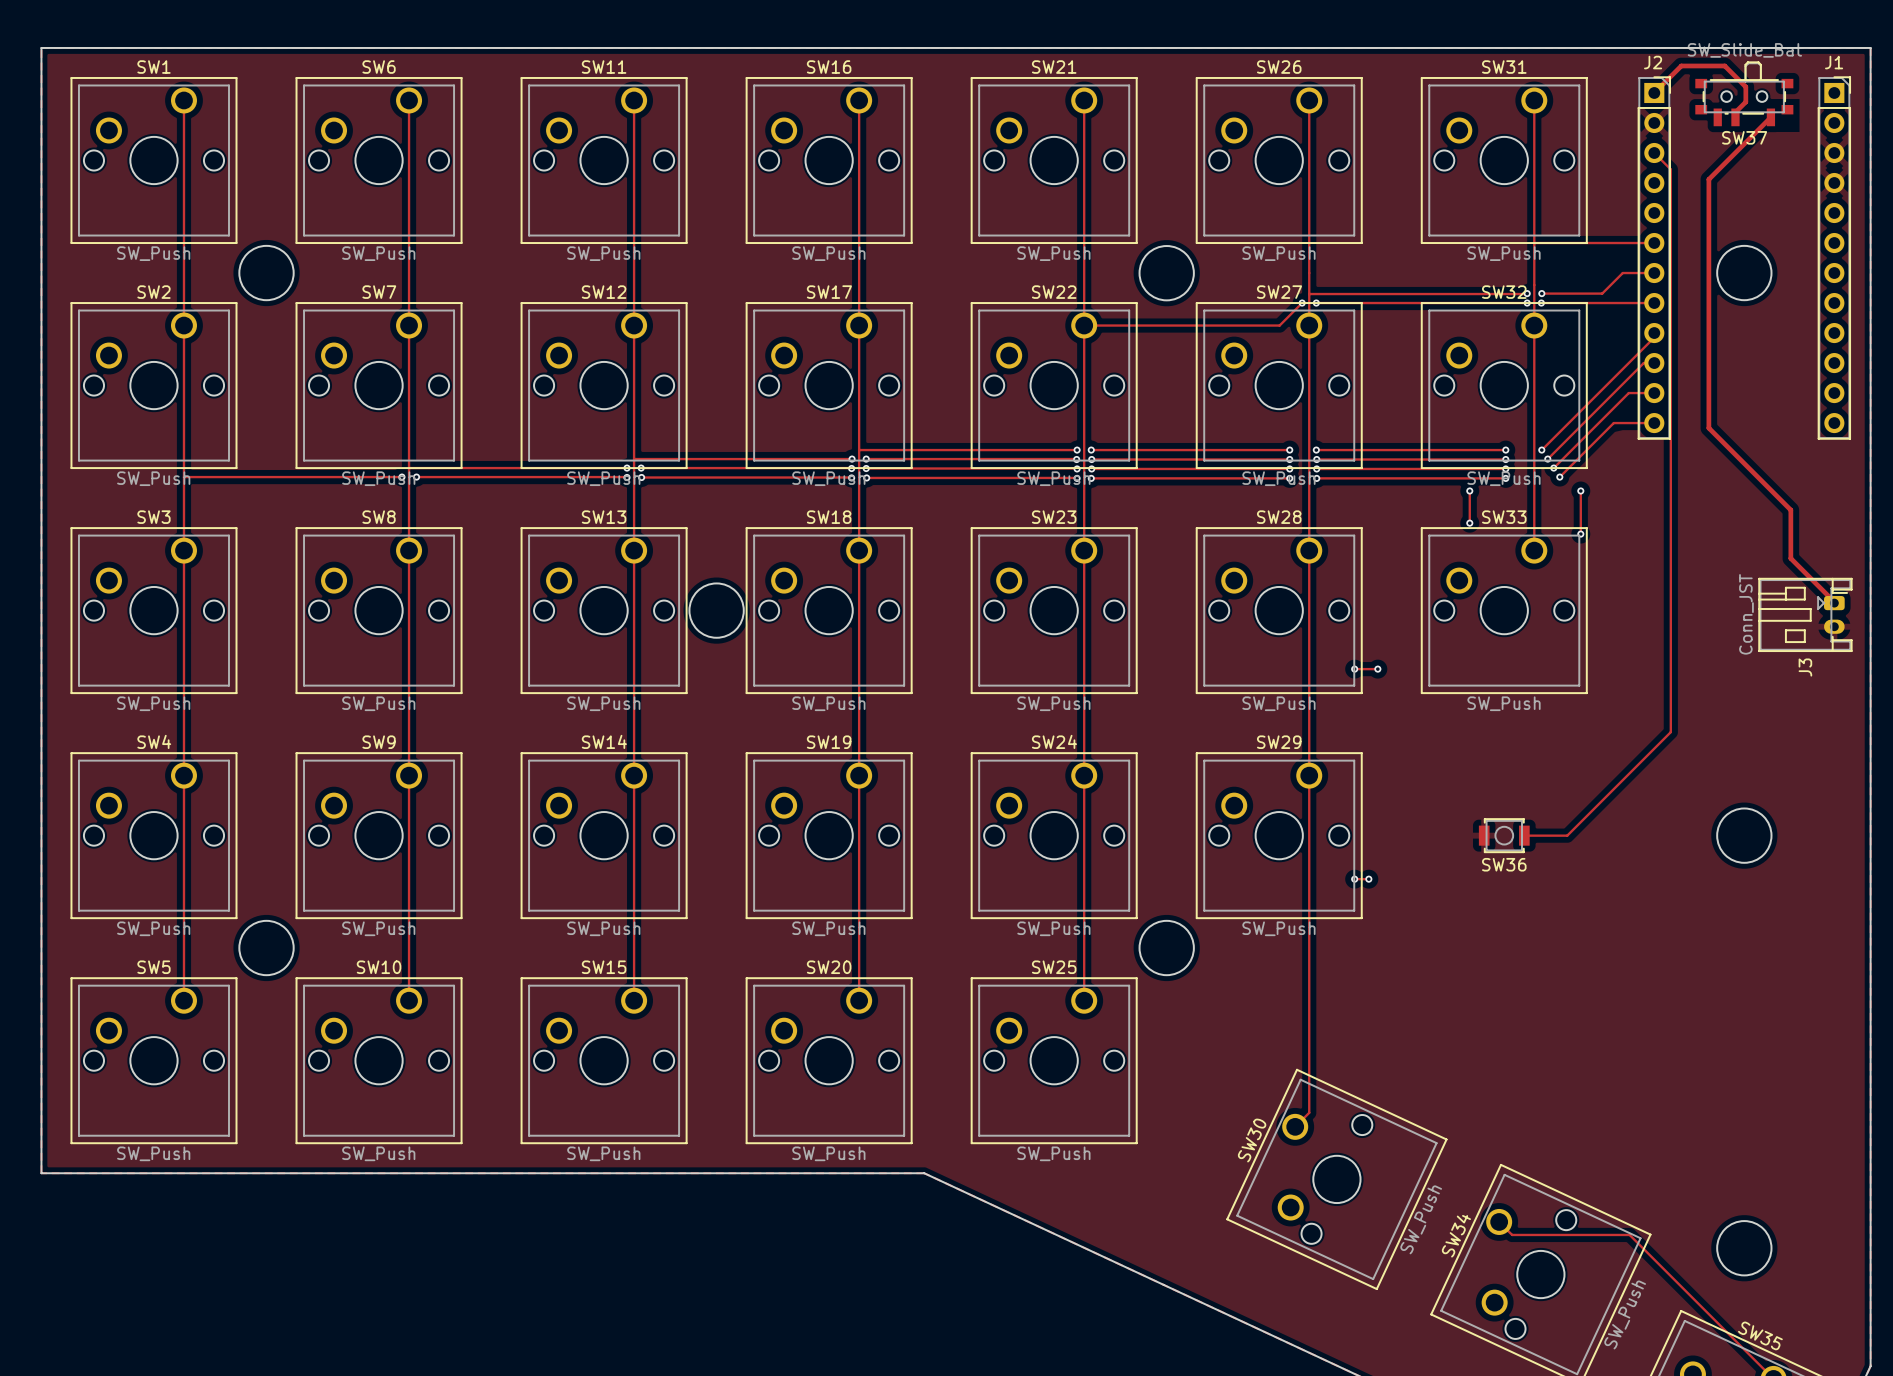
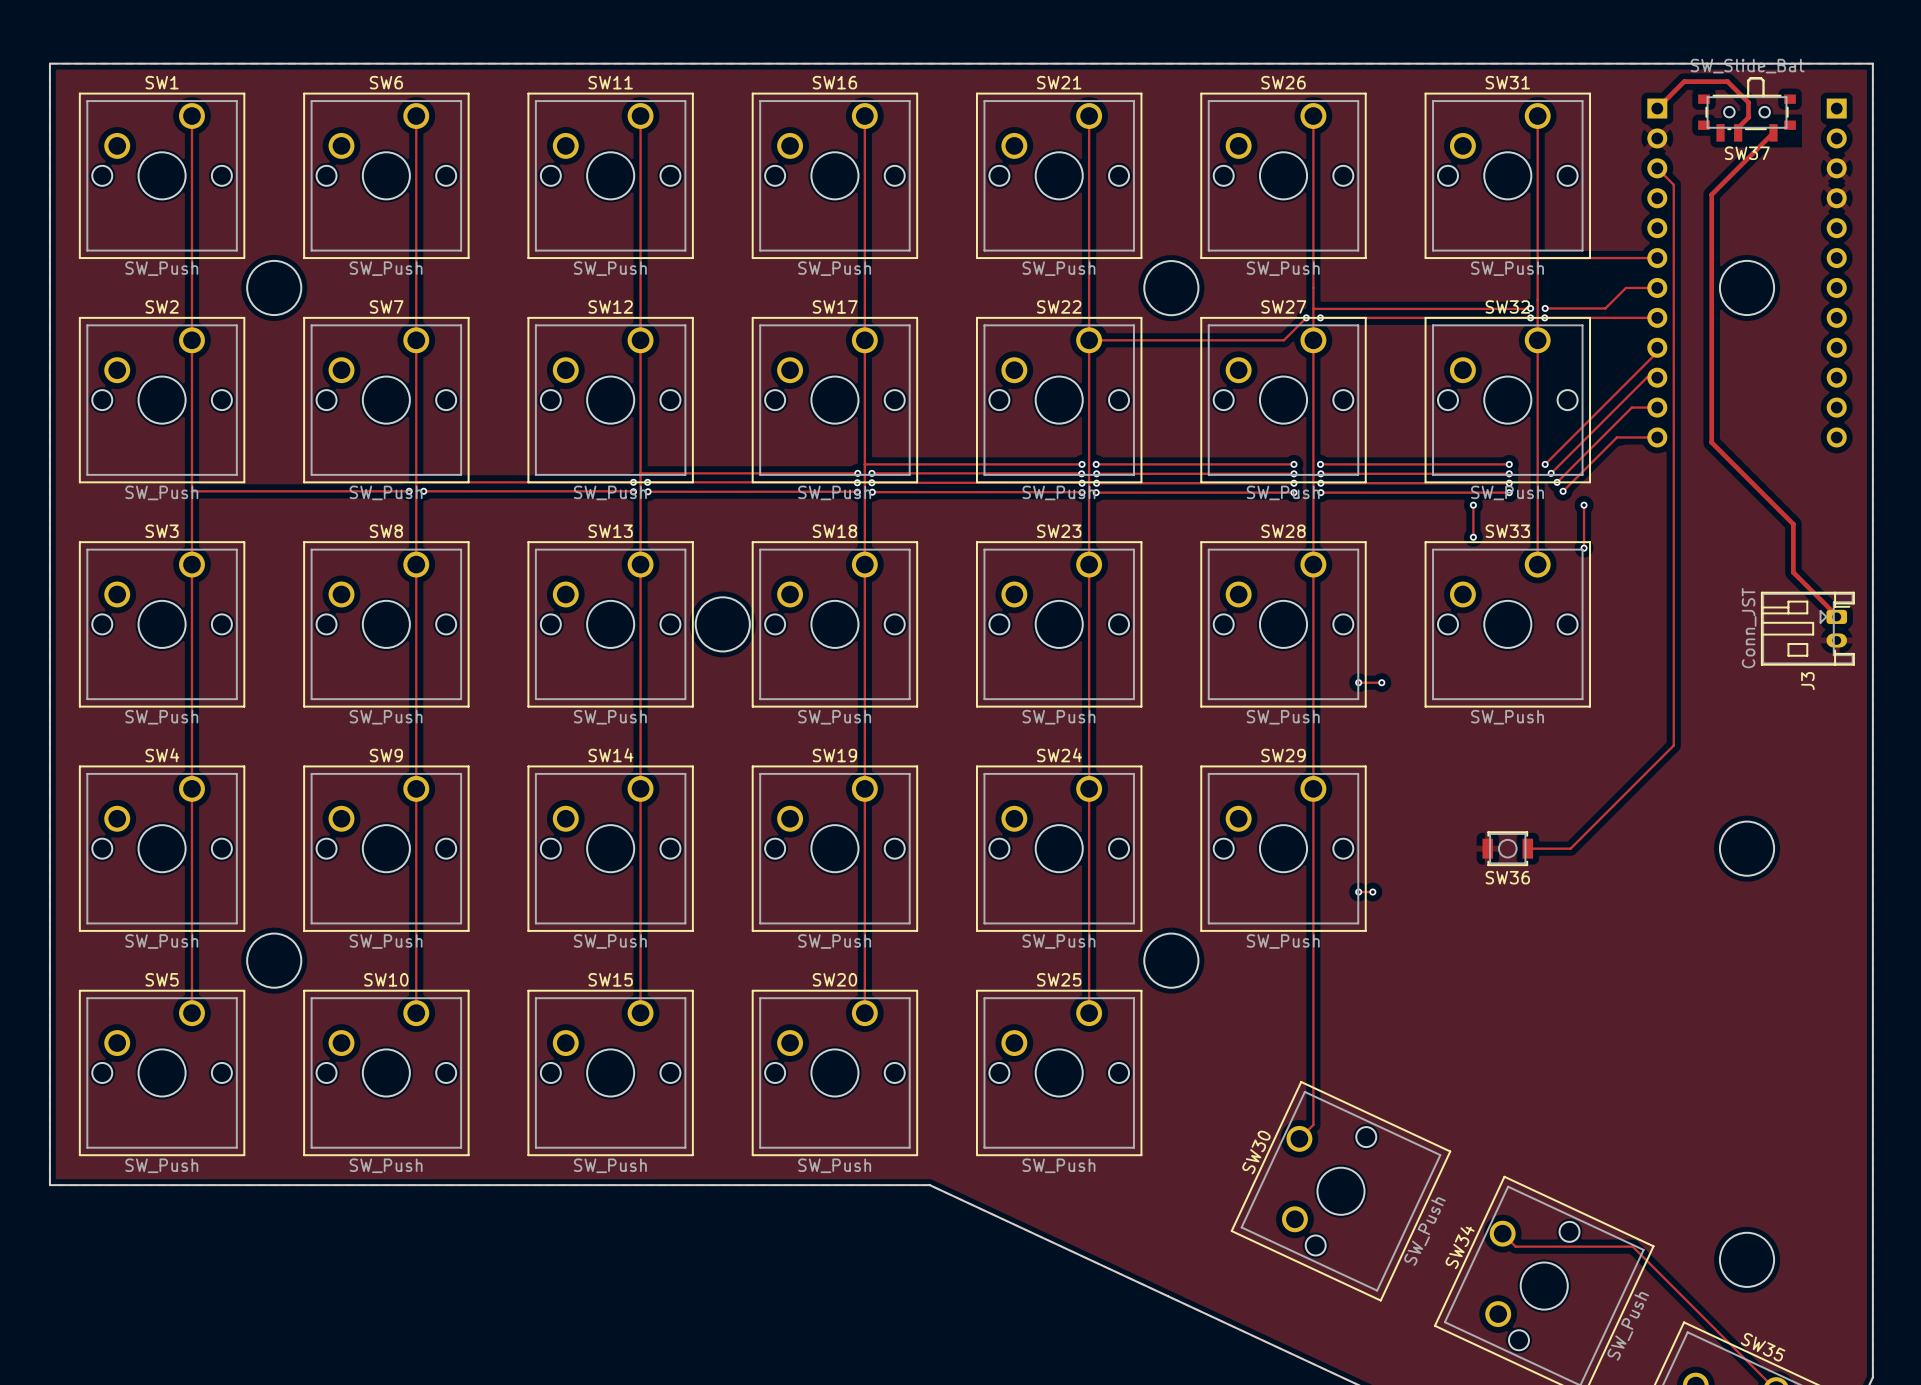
J2 side: top (1654, 258) -> bottom (1657, 273)
J1 side: top (1834, 258) -> bottom (1836, 273)

